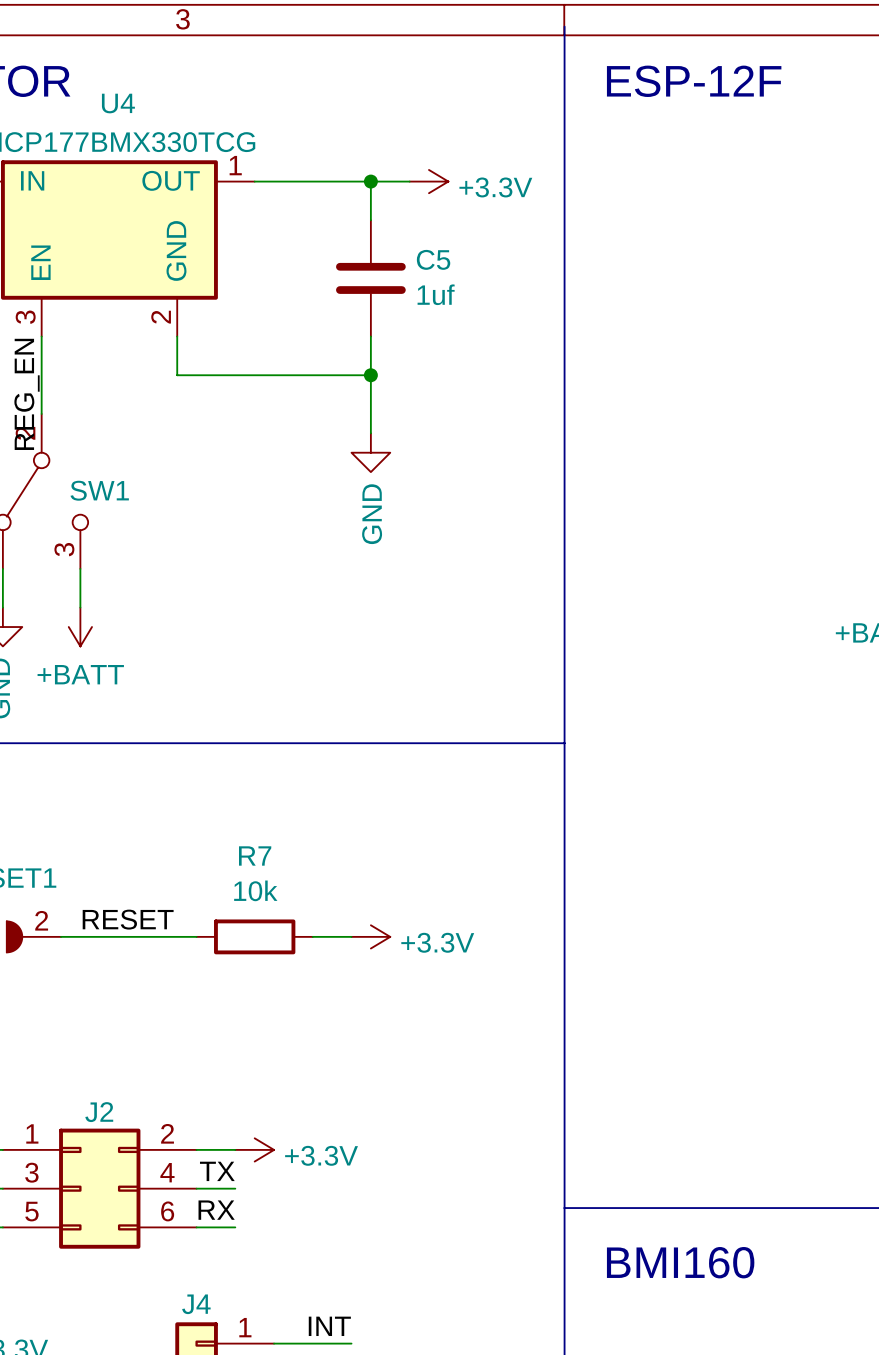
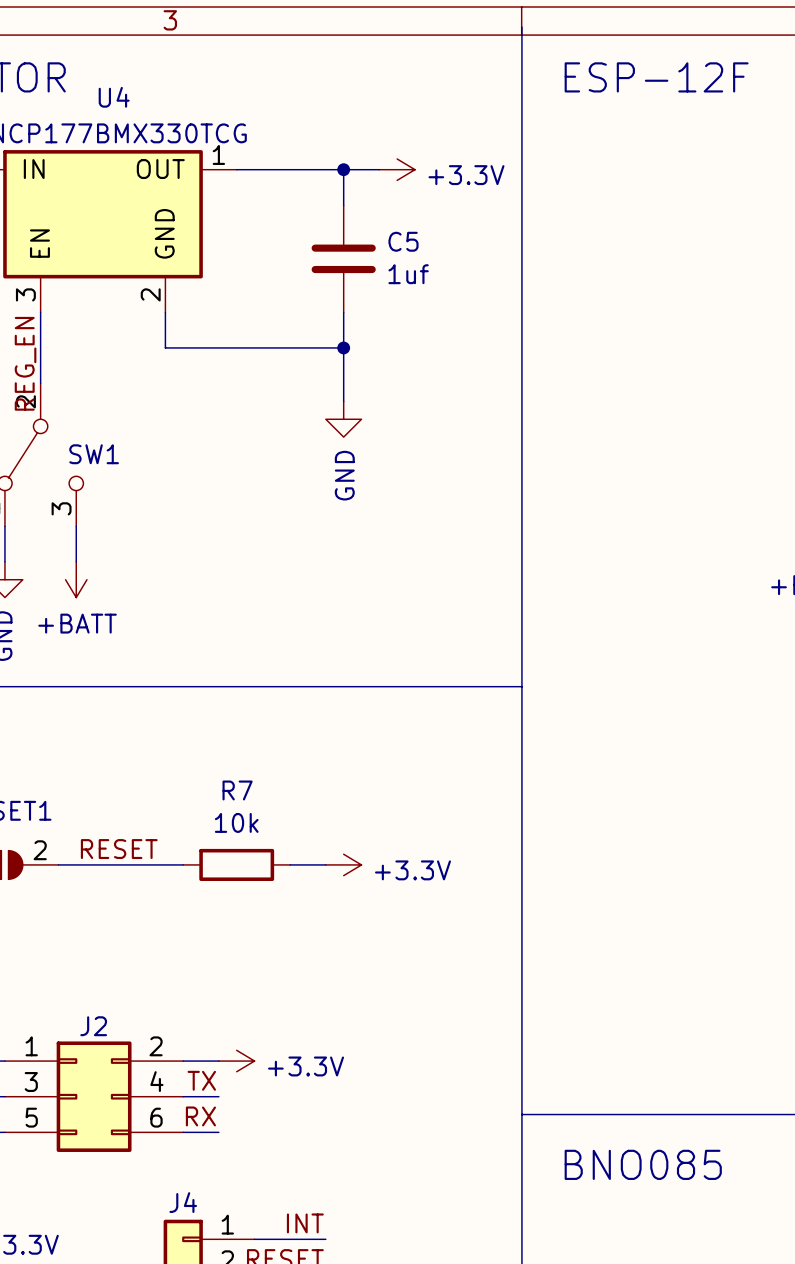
text: BMI160 (680, 1262) -> BNO085 (643, 1164)

